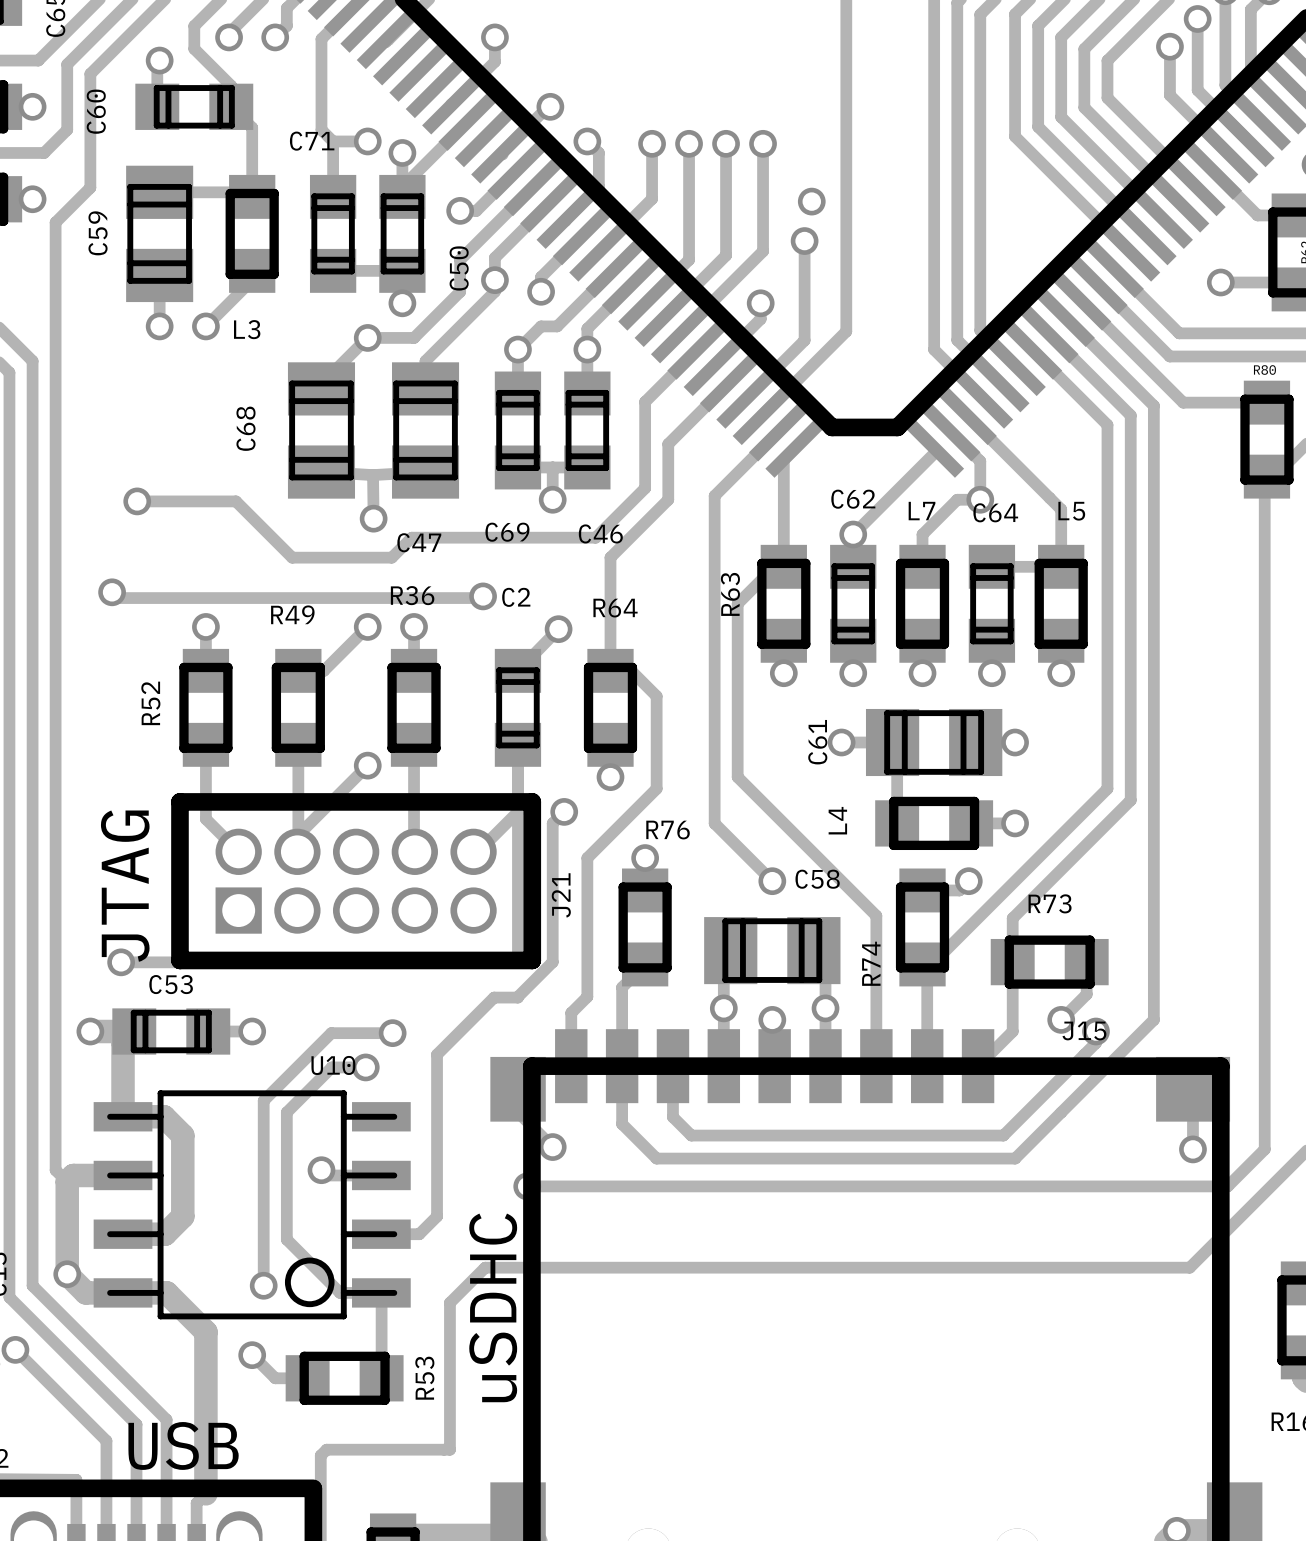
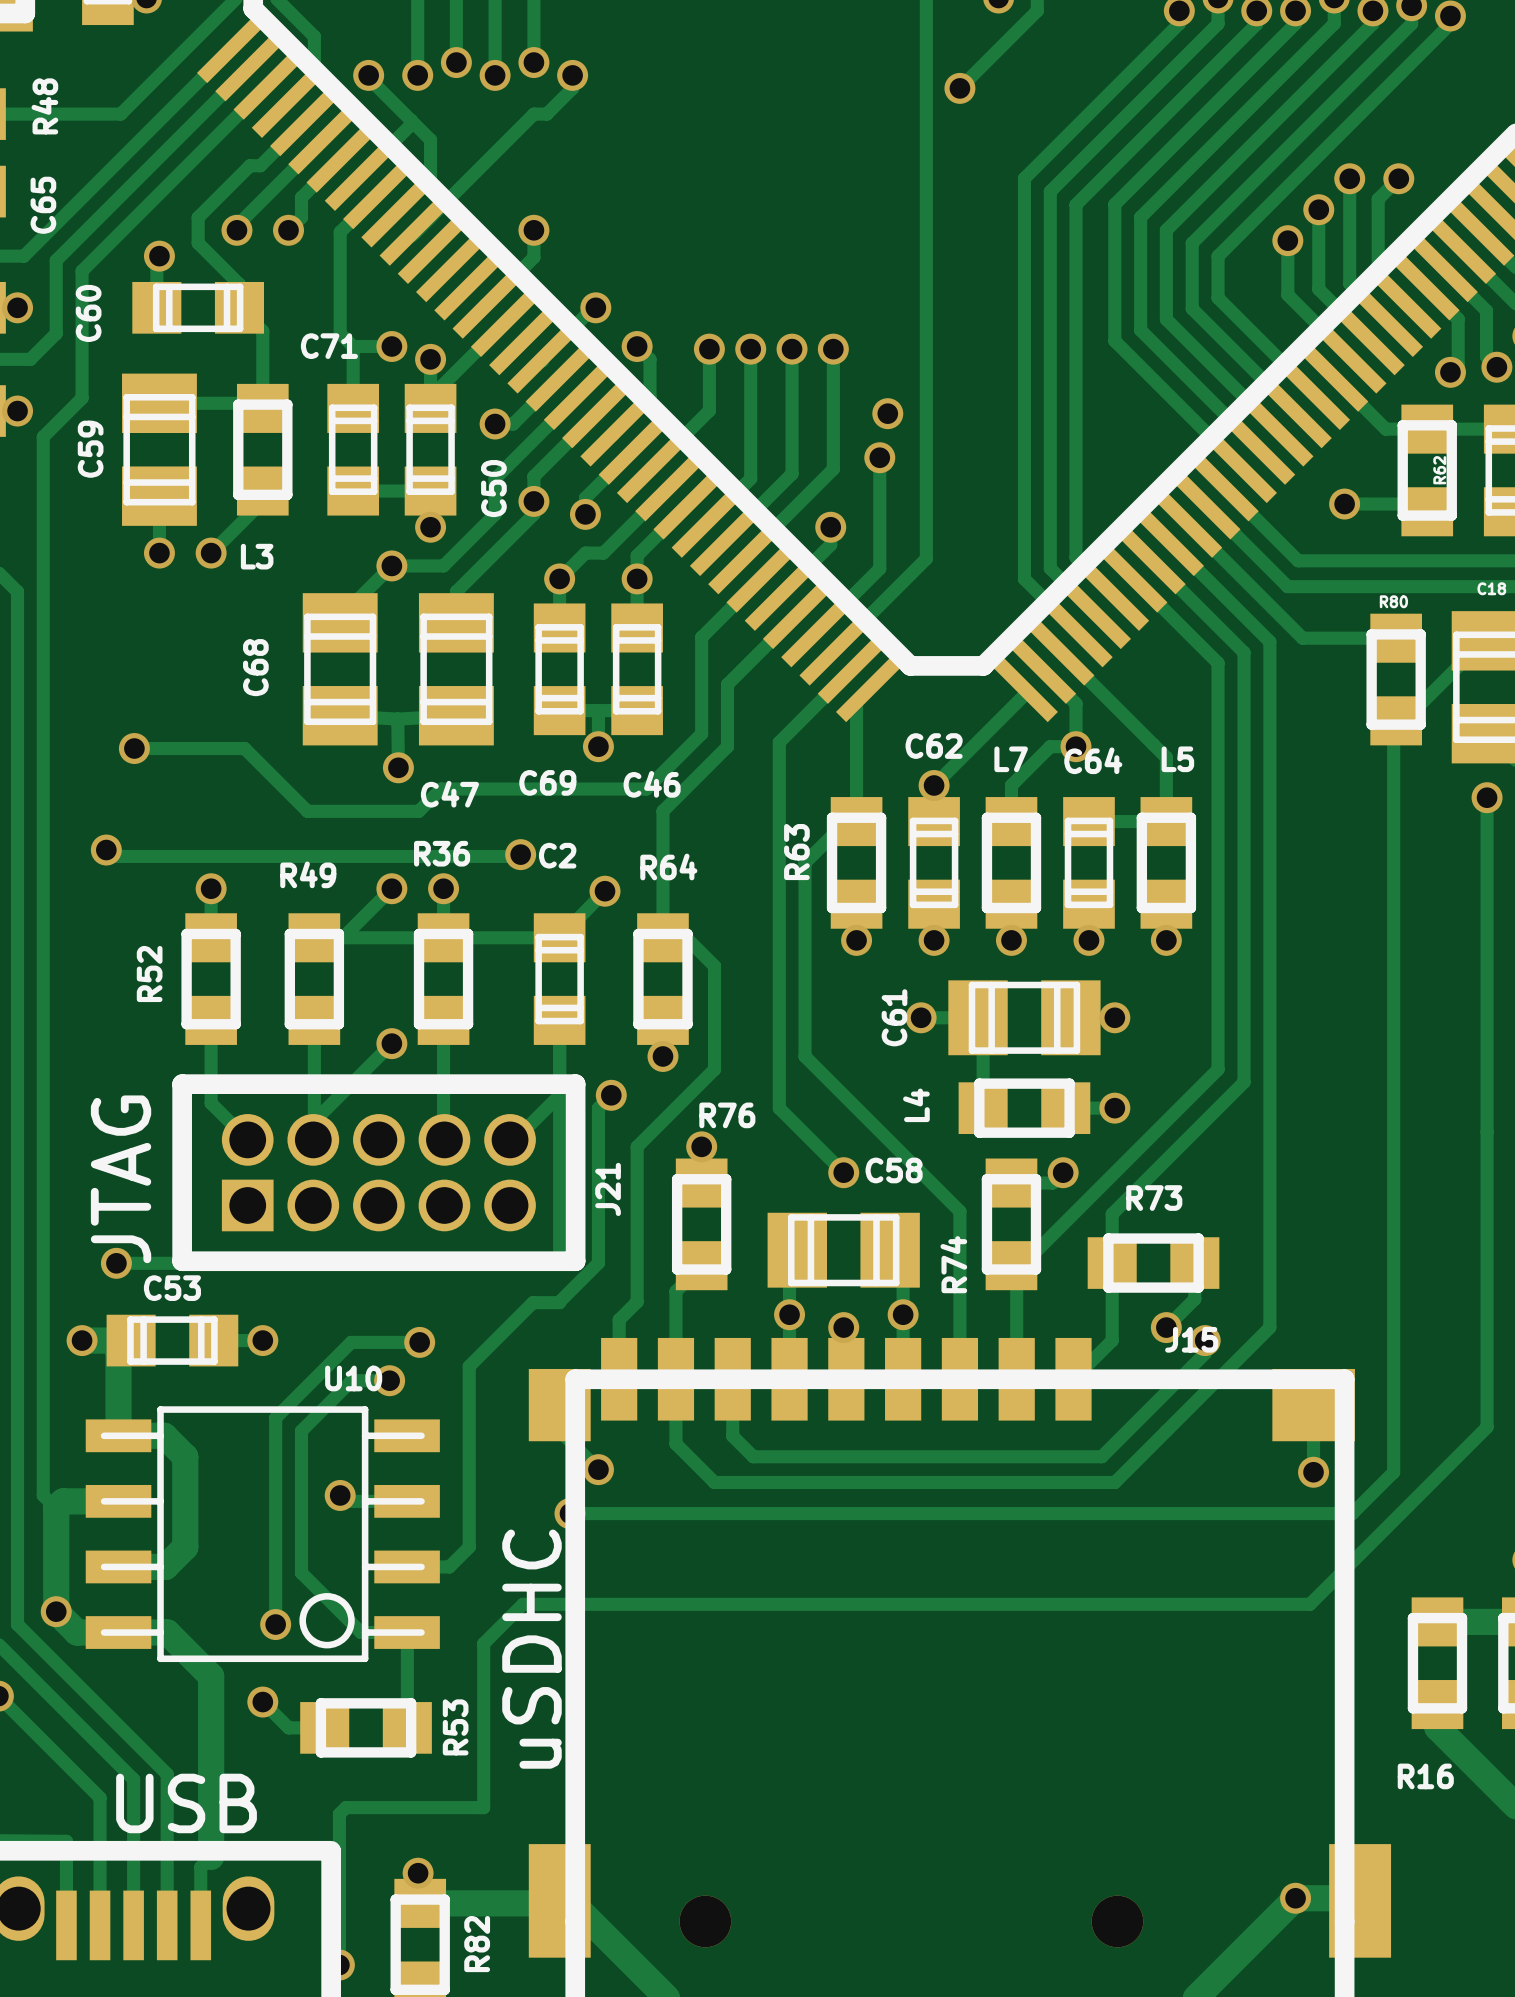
track: none -> (342, 937) (559, 937)
via: none -> (418, 1873)

